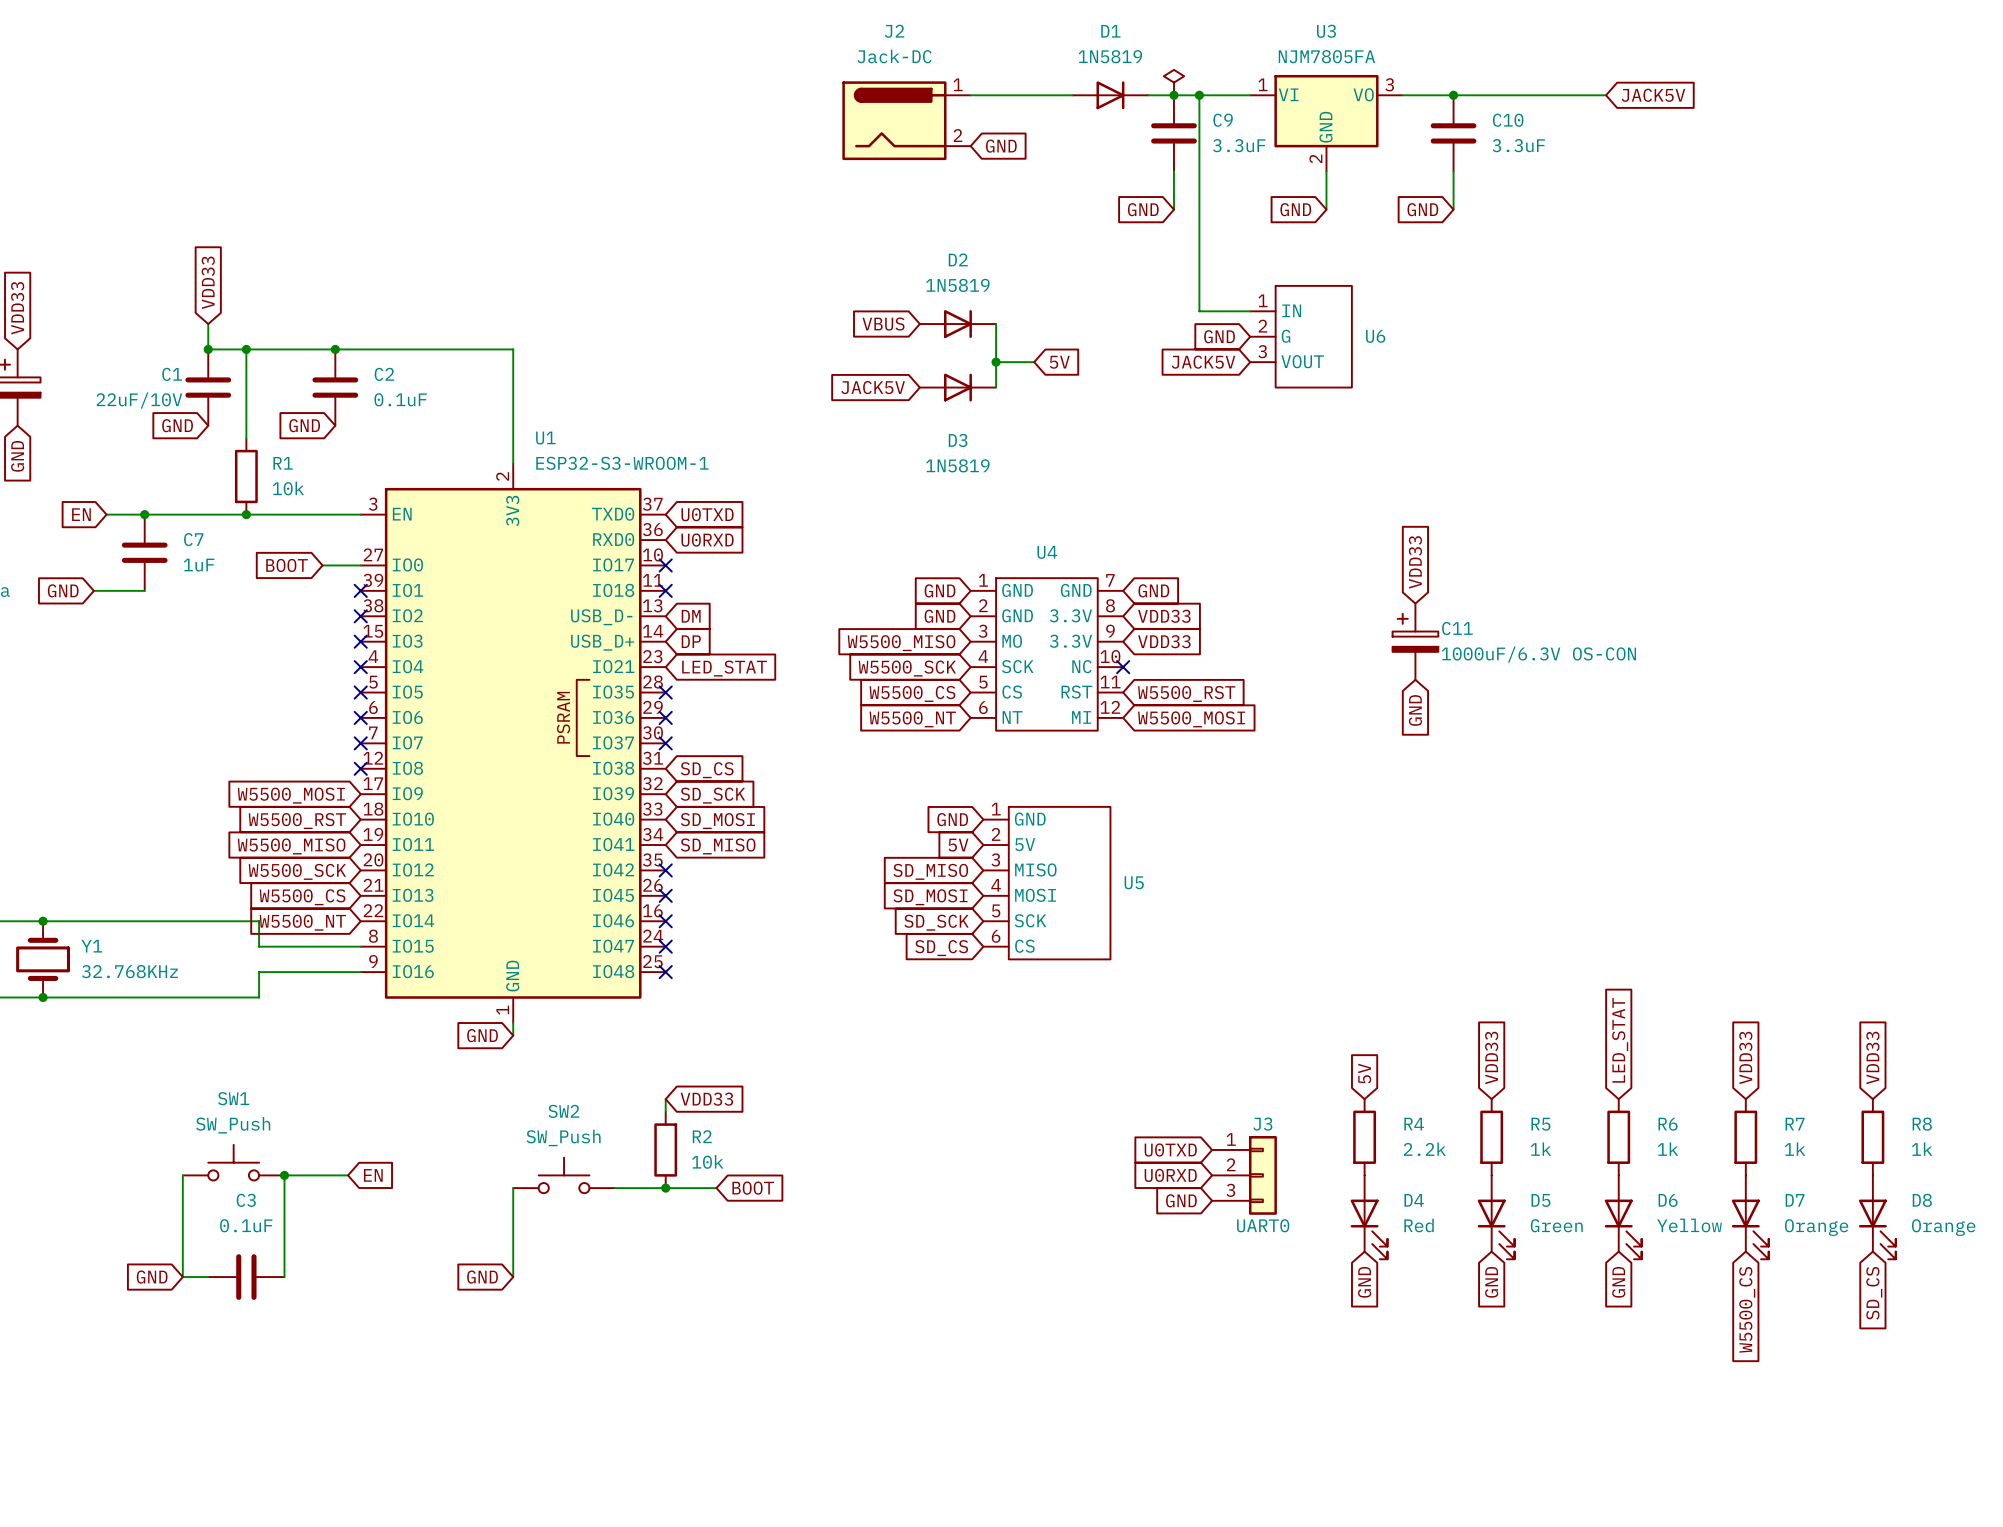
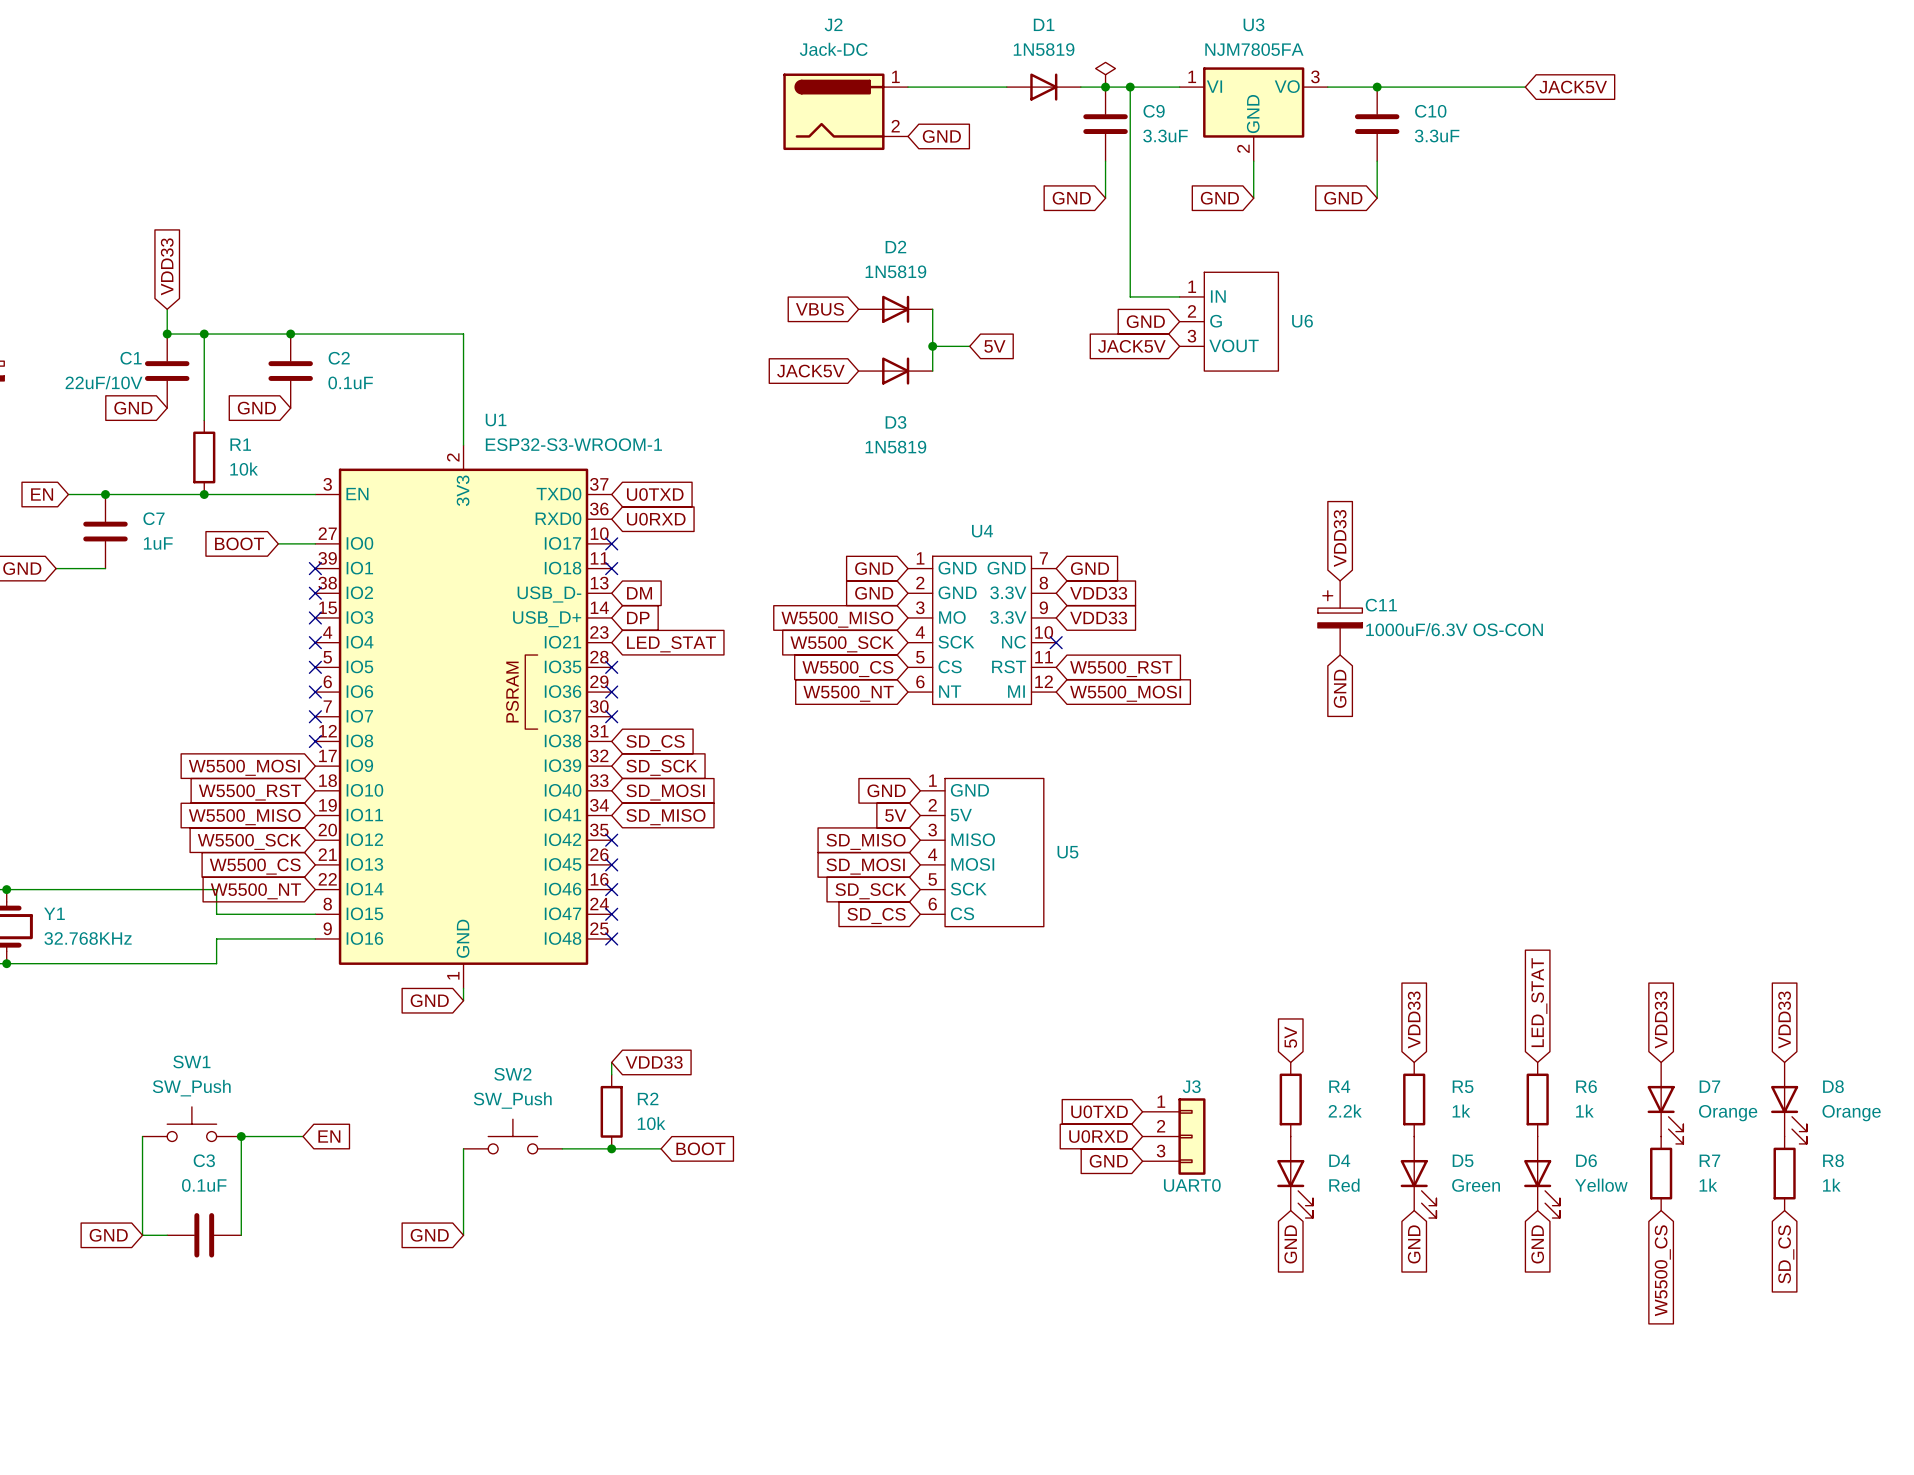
R7 position: (1745, 1137) -> (1661, 1173)
R8 position: (1872, 1137) -> (1784, 1173)
D7 position: (1750, 1217) -> (1665, 1103)
D8 position: (1877, 1217) -> (1788, 1103)

